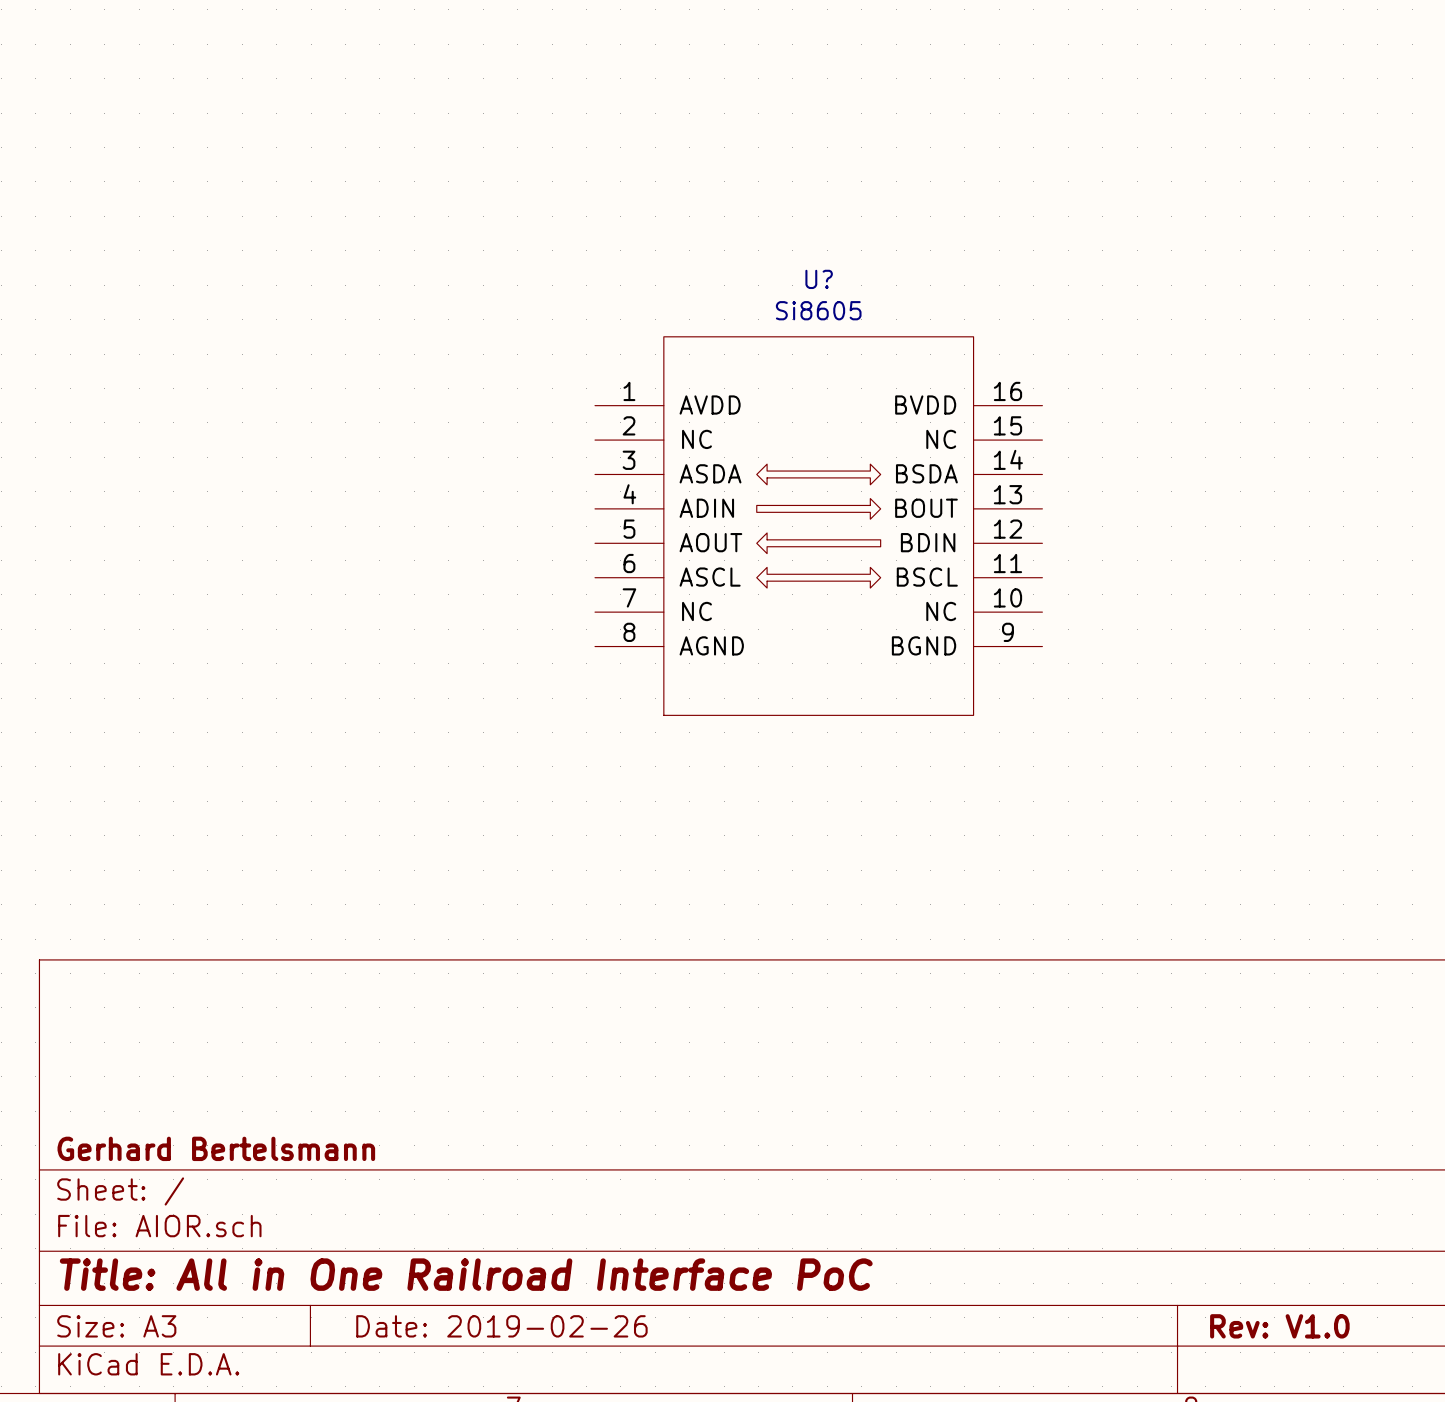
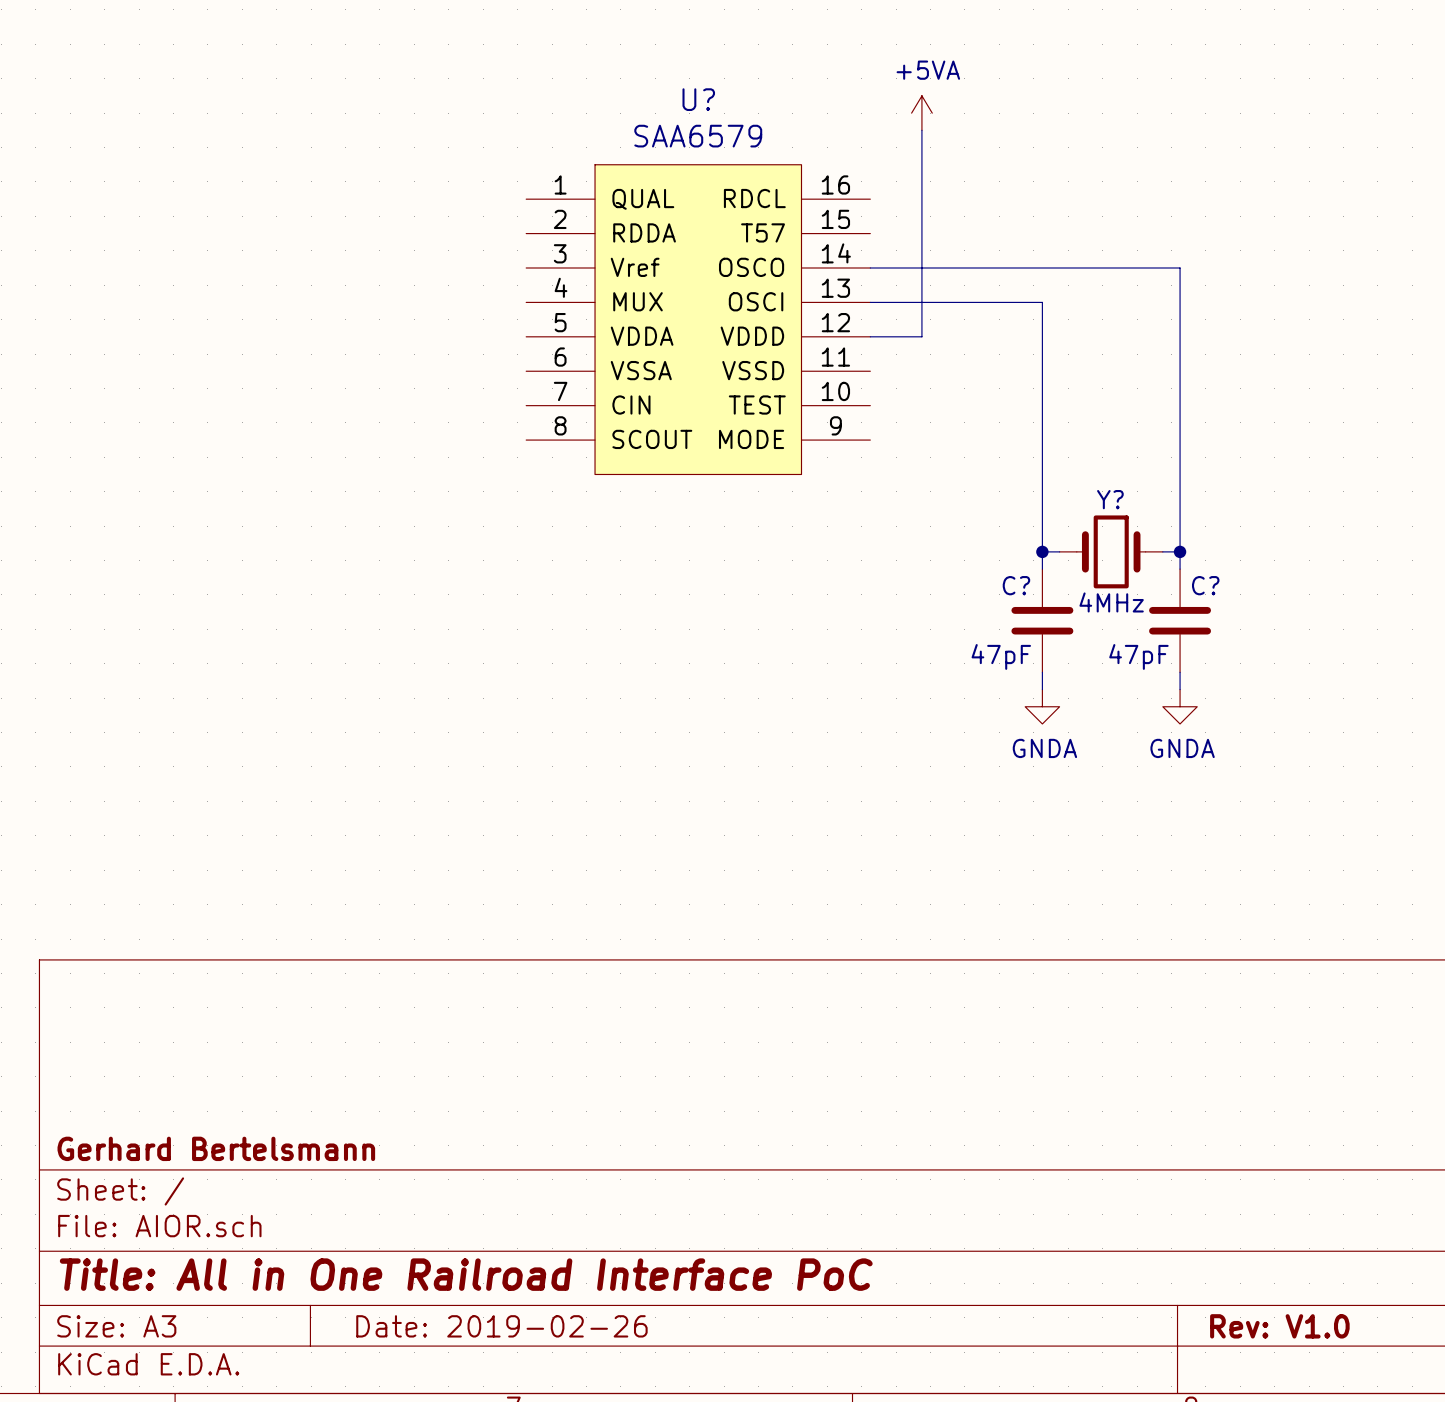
power symbol: none -> +5VA (921, 113)
wire: none -> (921, 130) (921, 336) (870, 336)
wire: none -> (870, 267) (1180, 267) (1180, 569)
wire: none -> (870, 302) (1042, 302) (1042, 569)
U?: none -> SAA6579 (698, 319)
U?: Si8605 (818, 526) -> none
wire: none -> (1042, 551) (1059, 551)
junction: none -> (1042, 551)
Y?: none -> 4MHz (1111, 551)
wire: none -> (1162, 551) (1180, 551)
junction: none -> (1180, 551)
C?: none -> 47pF (1042, 620)
C?: none -> 47pF (1180, 620)
wire: none -> (1042, 672) (1042, 689)
wire: none -> (1180, 672) (1180, 689)
power symbol: none -> GNDA (1042, 706)
power symbol: none -> GNDA (1180, 706)

